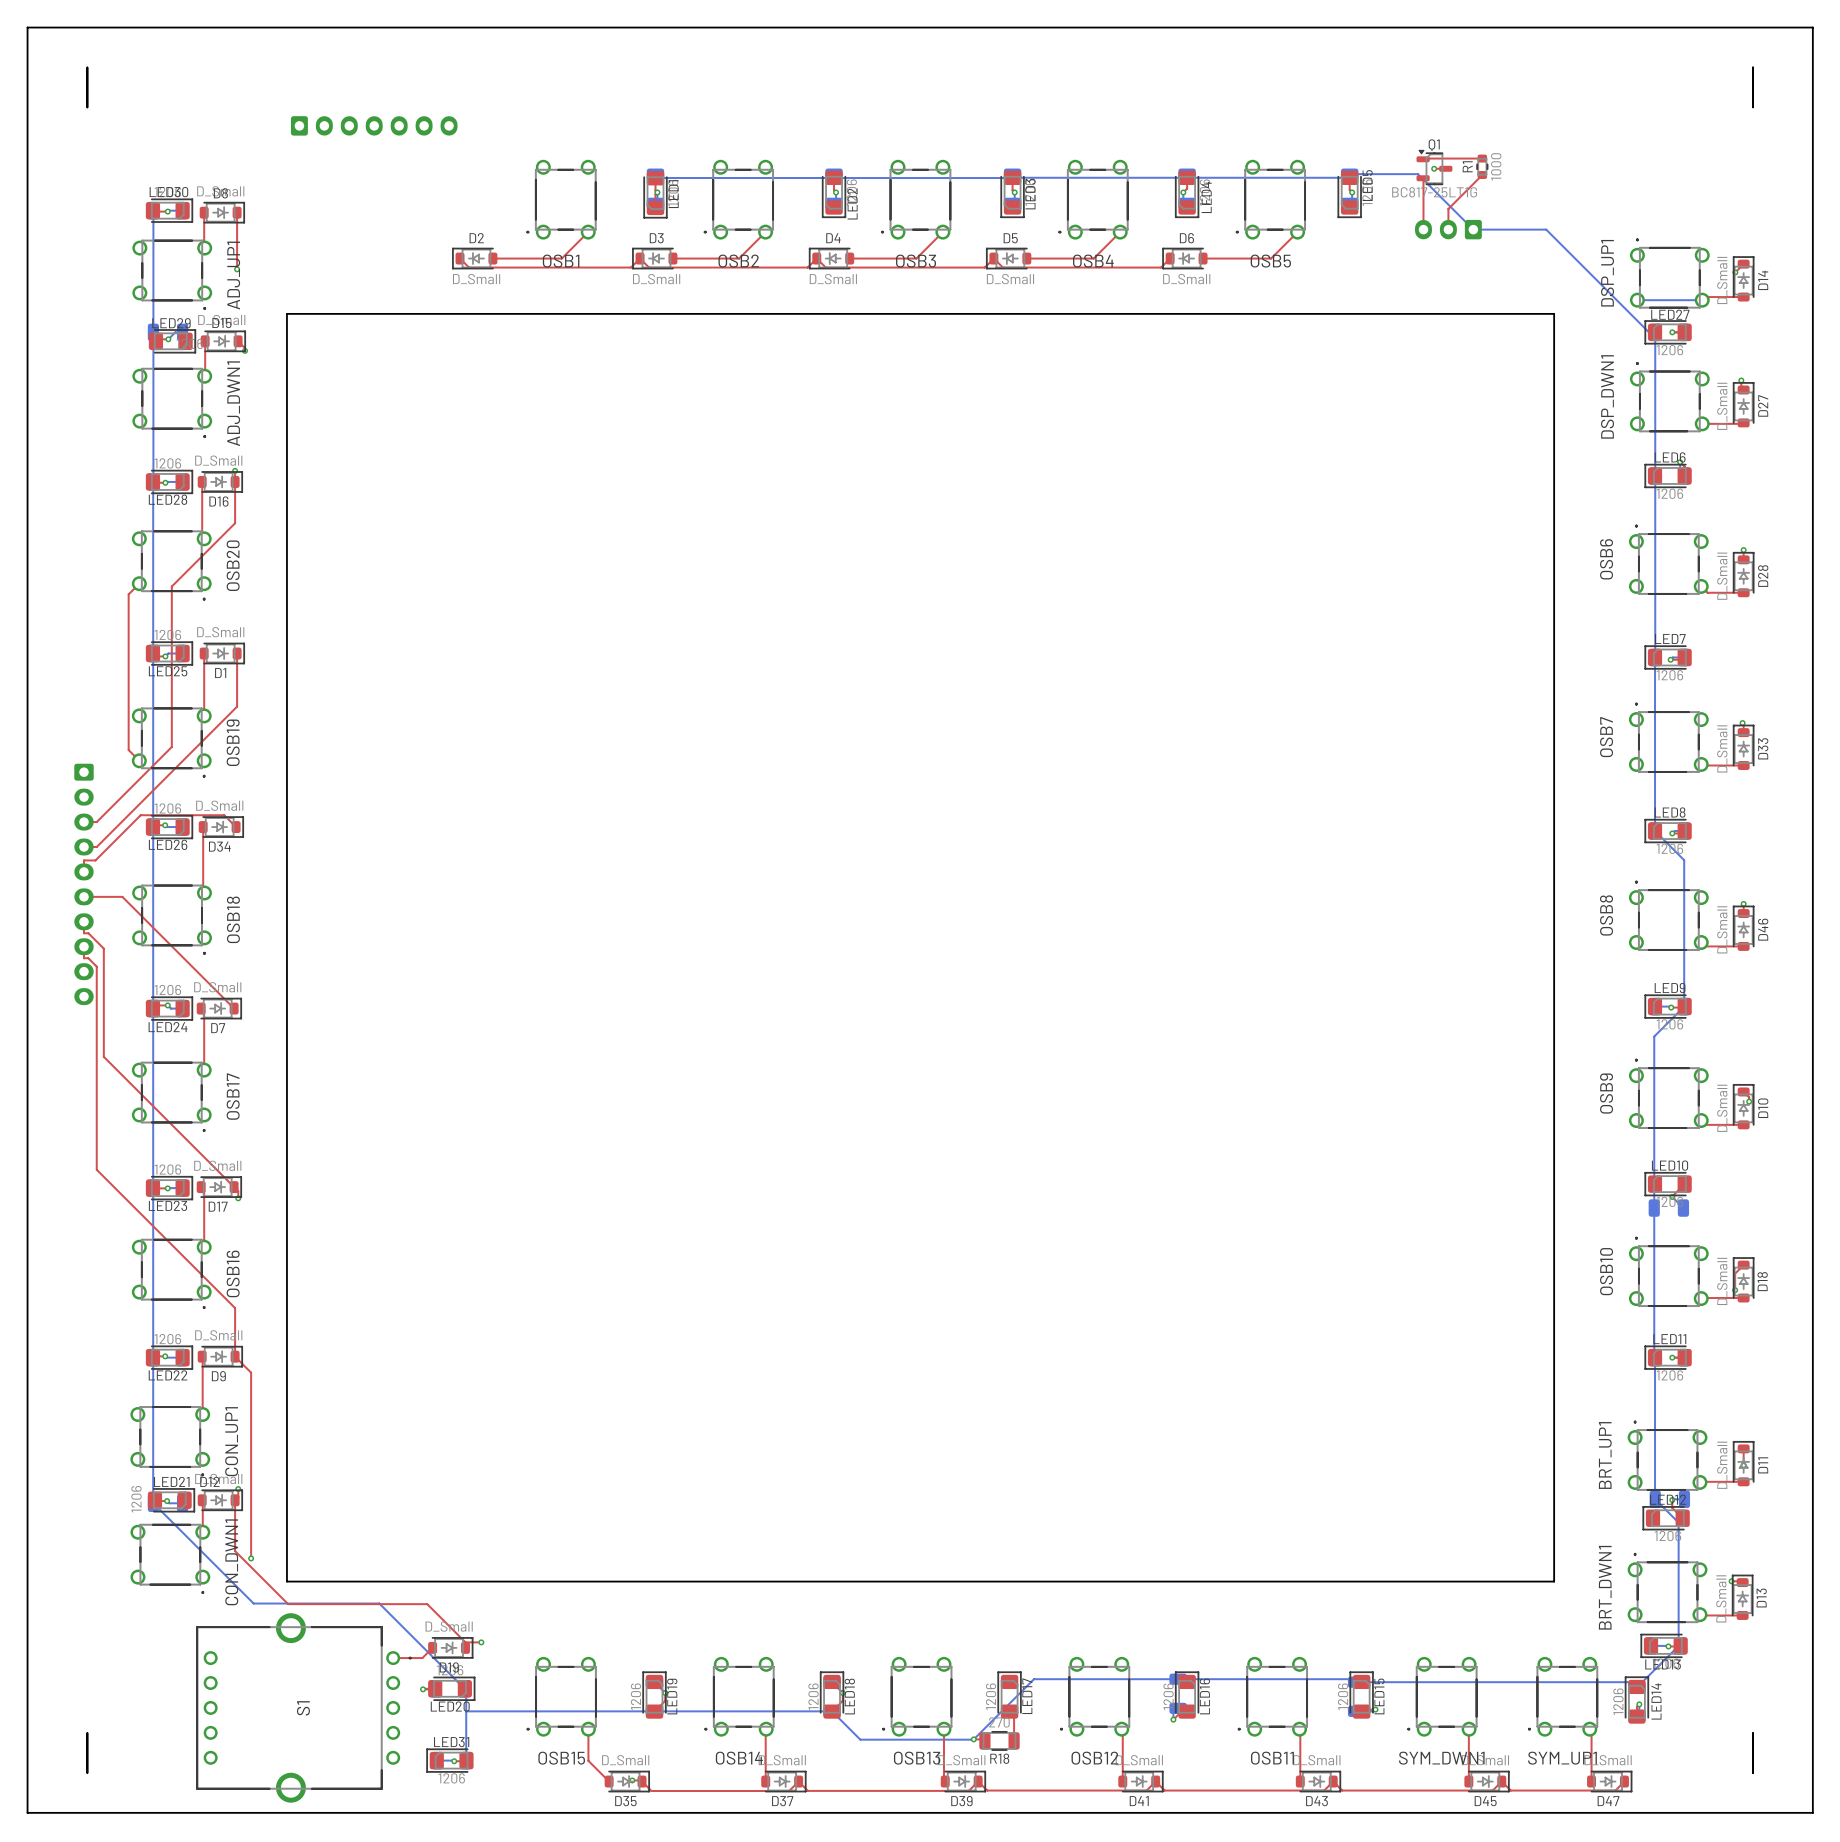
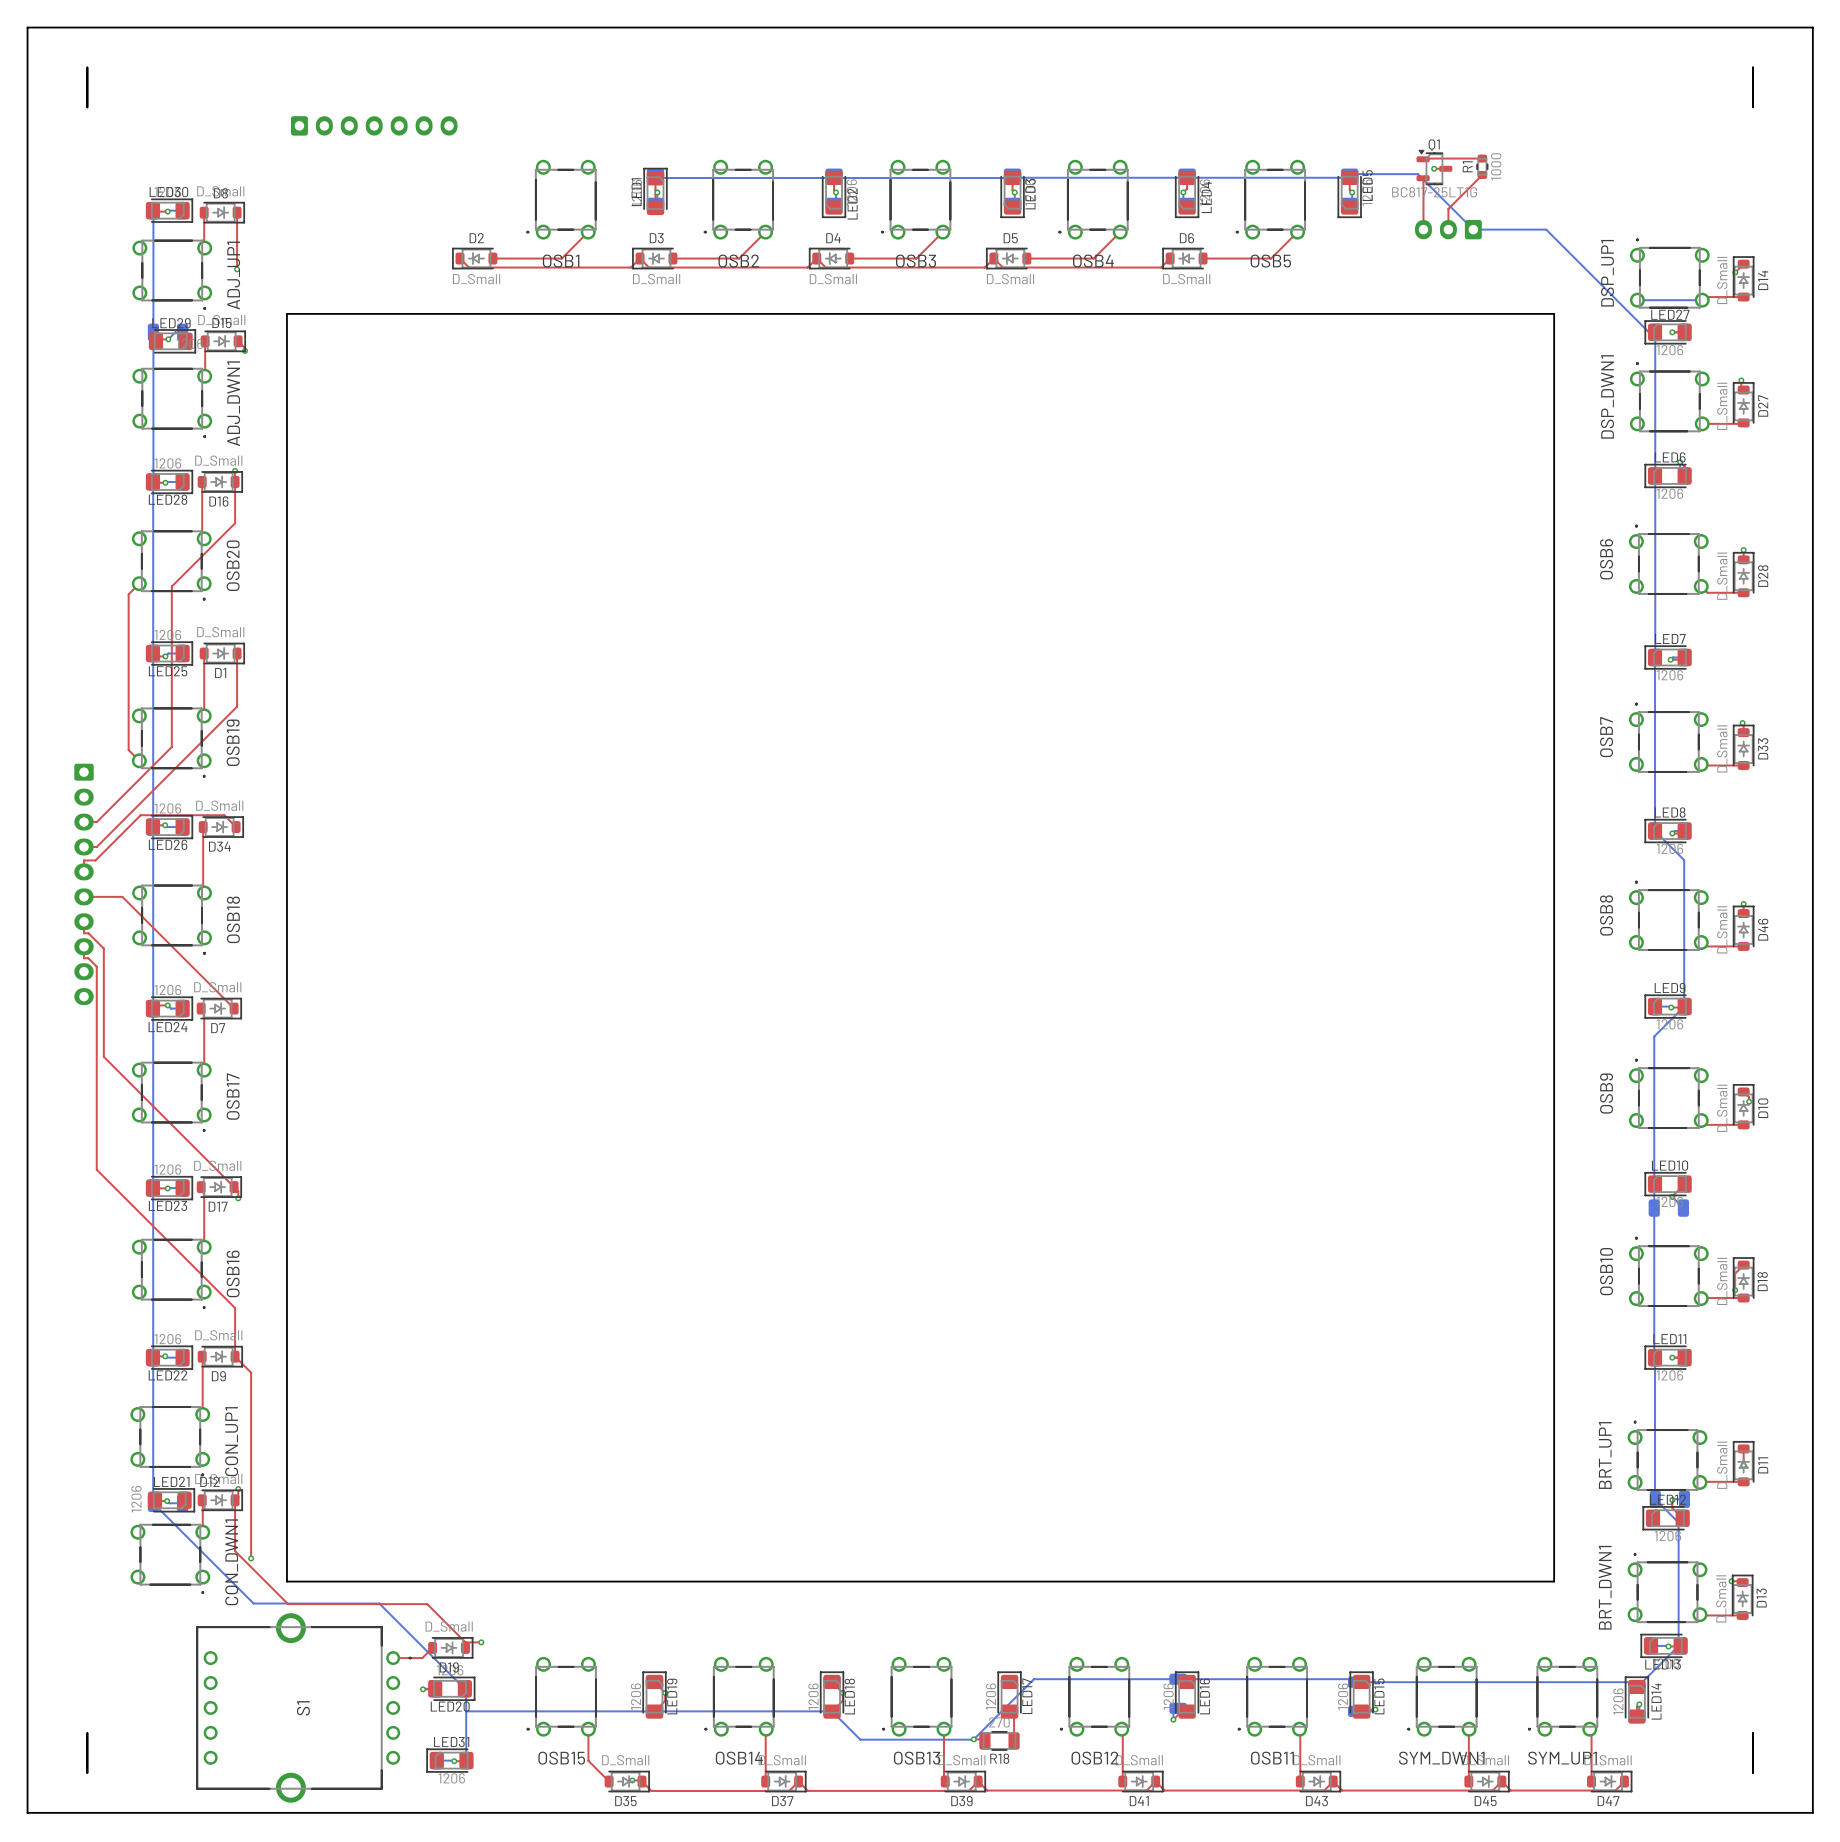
LED1 rotation: 0° (655, 194) -> 180° (655, 191)

